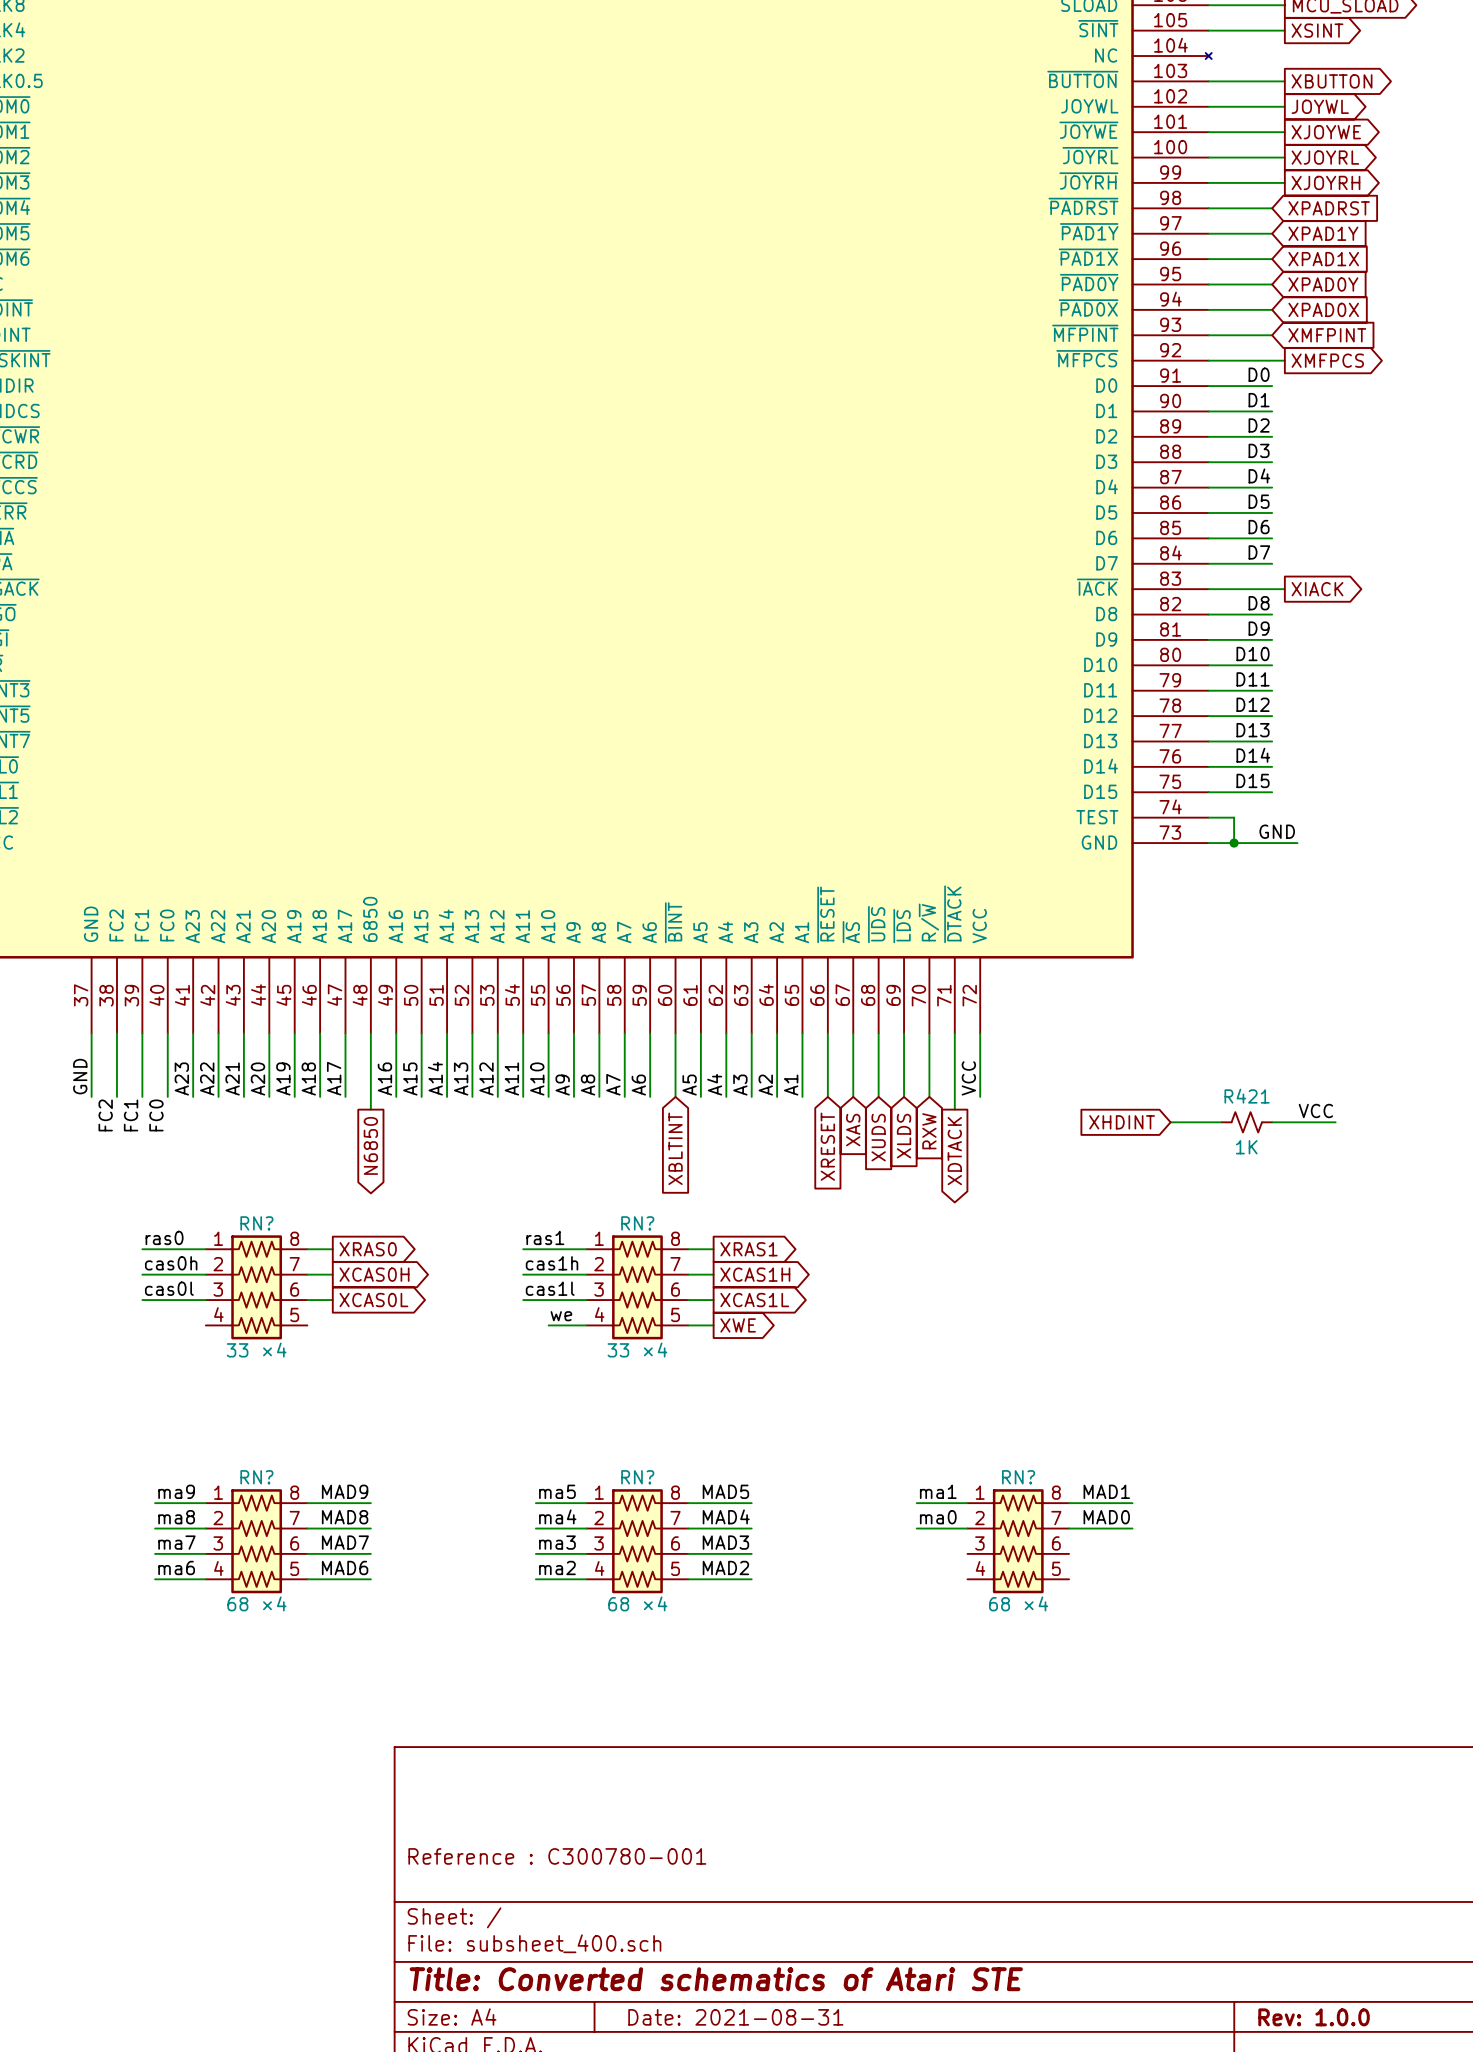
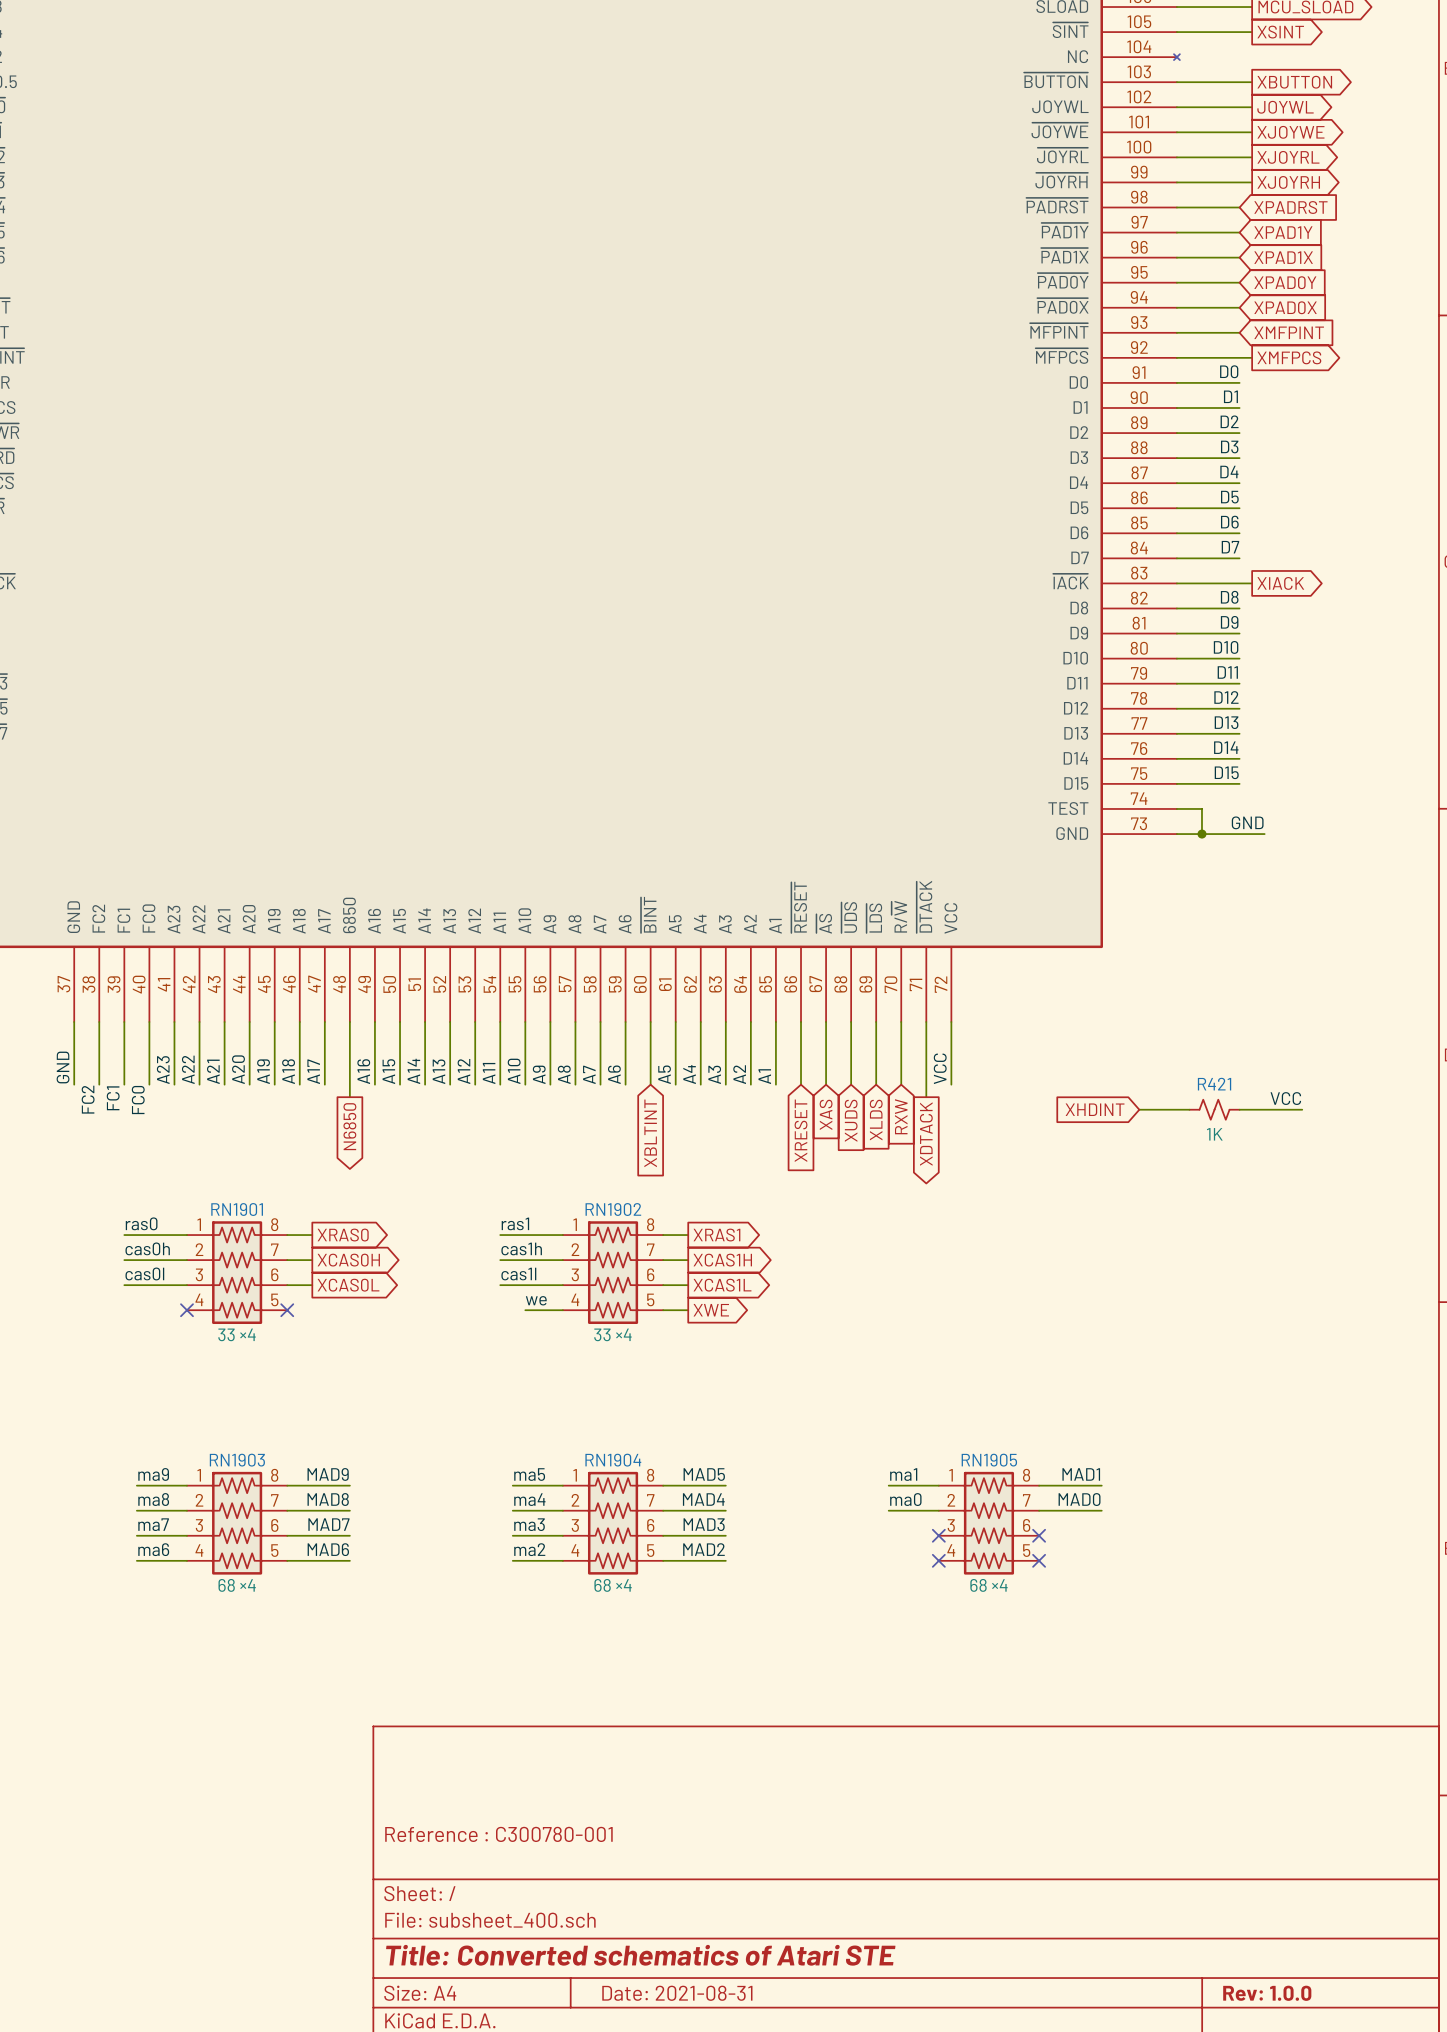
RN? name: RN? (256, 1223) -> RN1901 (237, 1209)
RN? name: RN? (637, 1223) -> RN1902 (613, 1209)
no-connect mark: none -> (186, 1310)
no-connect mark: none -> (287, 1310)
RN? name: RN? (256, 1477) -> RN1903 (237, 1460)
RN? name: RN? (637, 1477) -> RN1904 (613, 1460)
RN? name: RN? (1018, 1477) -> RN1905 (989, 1460)
no-connect mark: none -> (938, 1535)
no-connect mark: none -> (1039, 1535)
no-connect mark: none -> (938, 1560)
no-connect mark: none -> (1039, 1560)

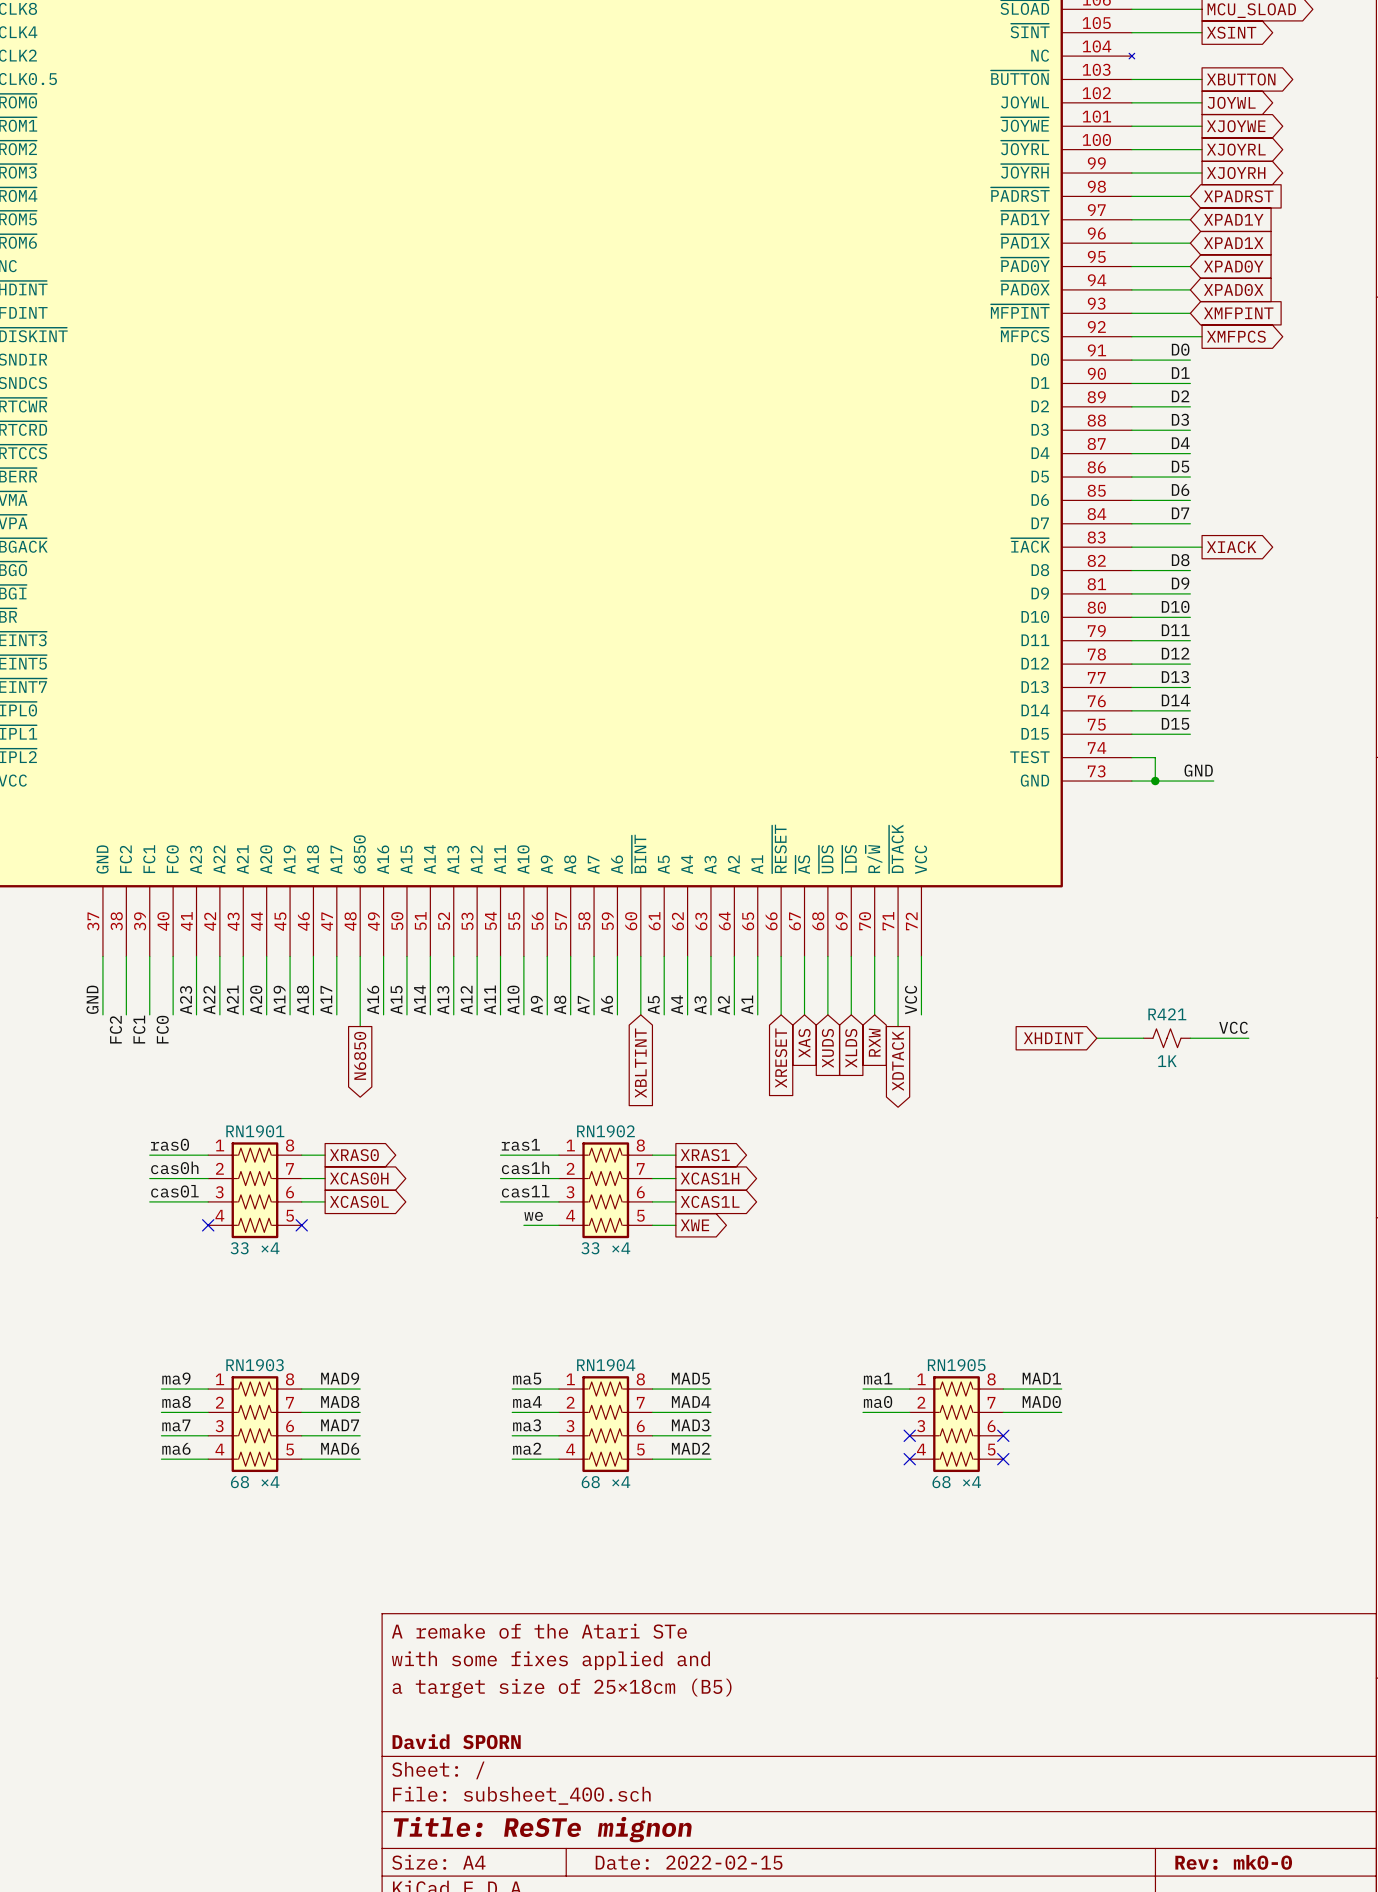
title block: none -> A remake of the Atari STe (539, 1631)
title block: none -> with some fixes applied and (550, 1660)
title block: none -> a target size of 25×18cm (B5) (562, 1688)
title block: Reference : C300780-001 (498, 1834) -> none
title block: none -> David SPORN (456, 1741)
title block: Title: Converted schematics of Atari STE (640, 1955) -> Title: ReSTe mignon (542, 1829)
title block: Date: 2021-08-31 (677, 1993) -> Date: 2022-02-15 (689, 1862)
title block: Rev: 1.0.0 (1267, 1993) -> Rev: mk0-0 (1233, 1862)

